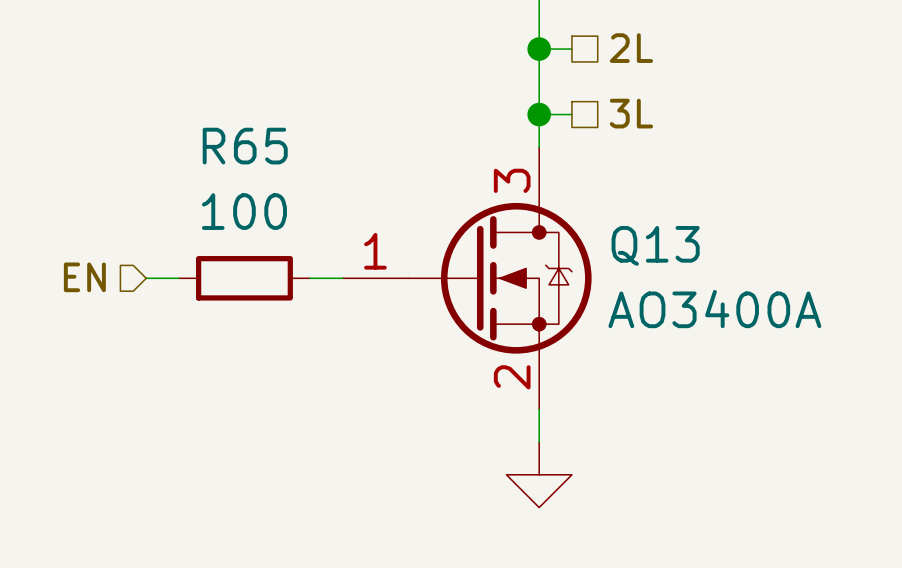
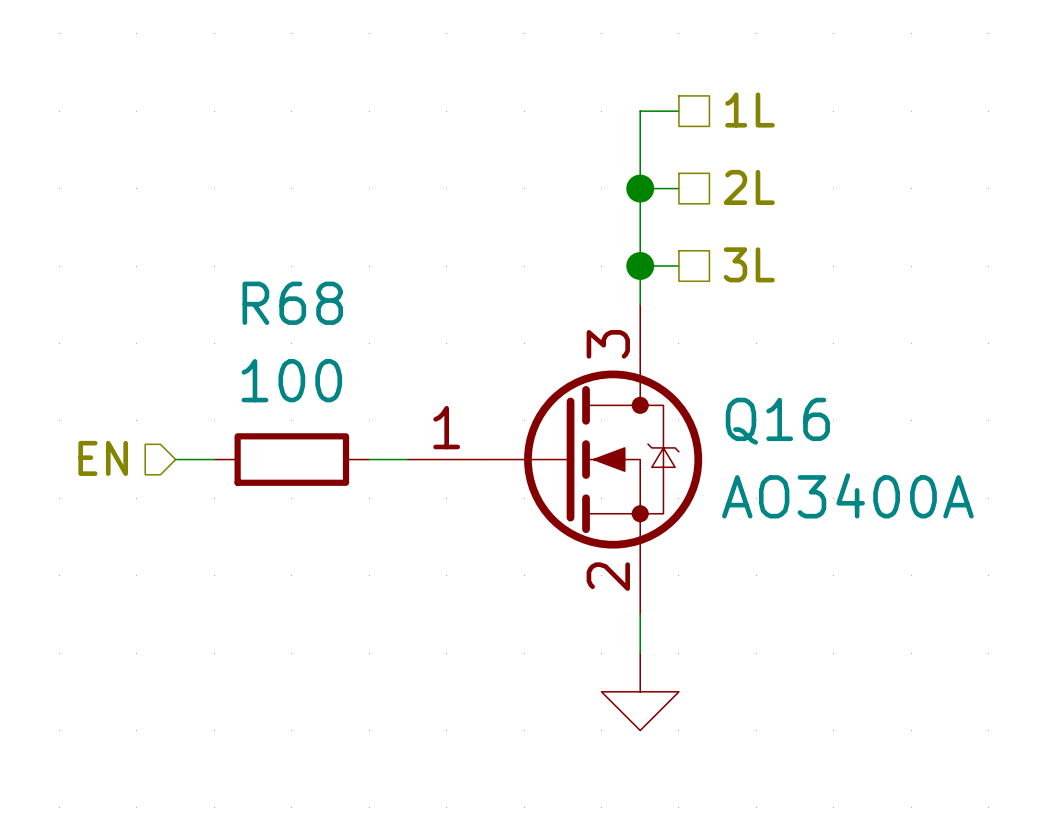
R65 name: R65 (245, 146) -> R68 (292, 303)
Q13 name: Q13 (655, 245) -> Q16 (777, 421)

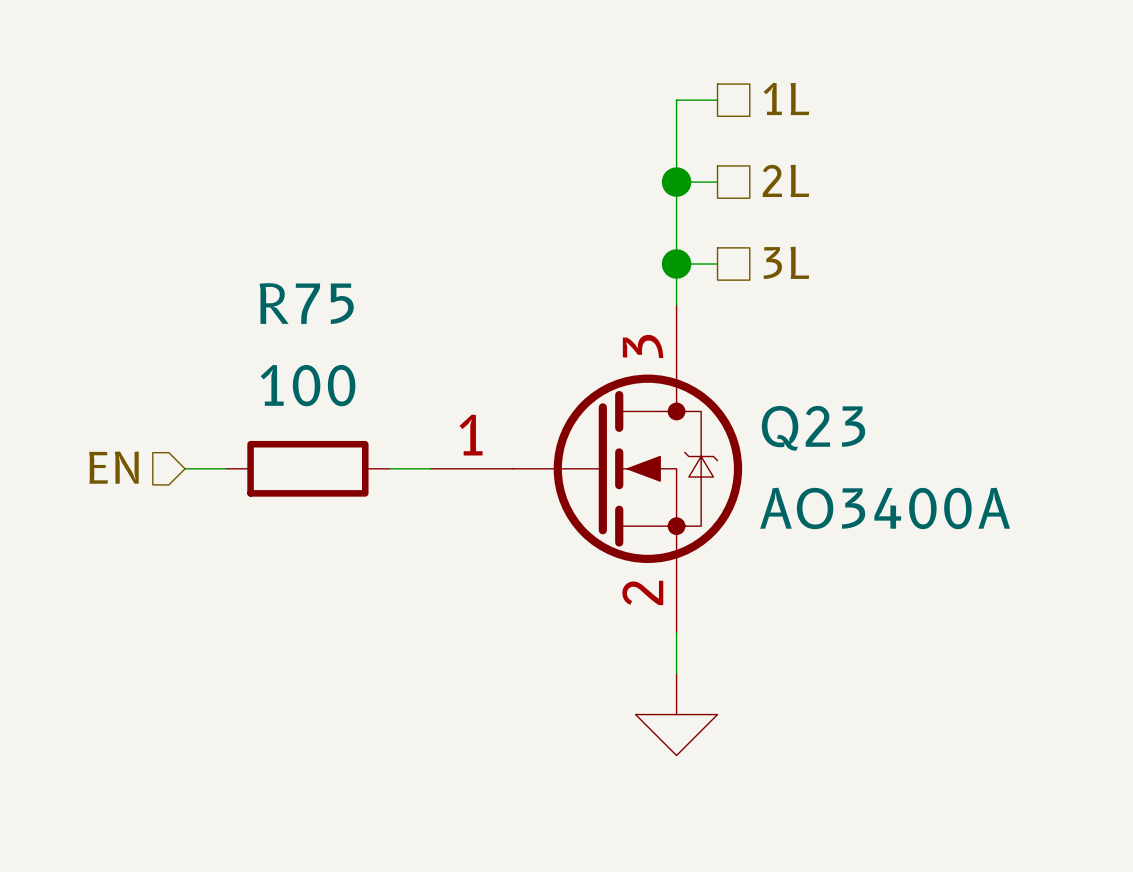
R68 name: R68 (292, 303) -> R75 (306, 303)
Q16 name: Q16 (777, 421) -> Q23 (813, 428)

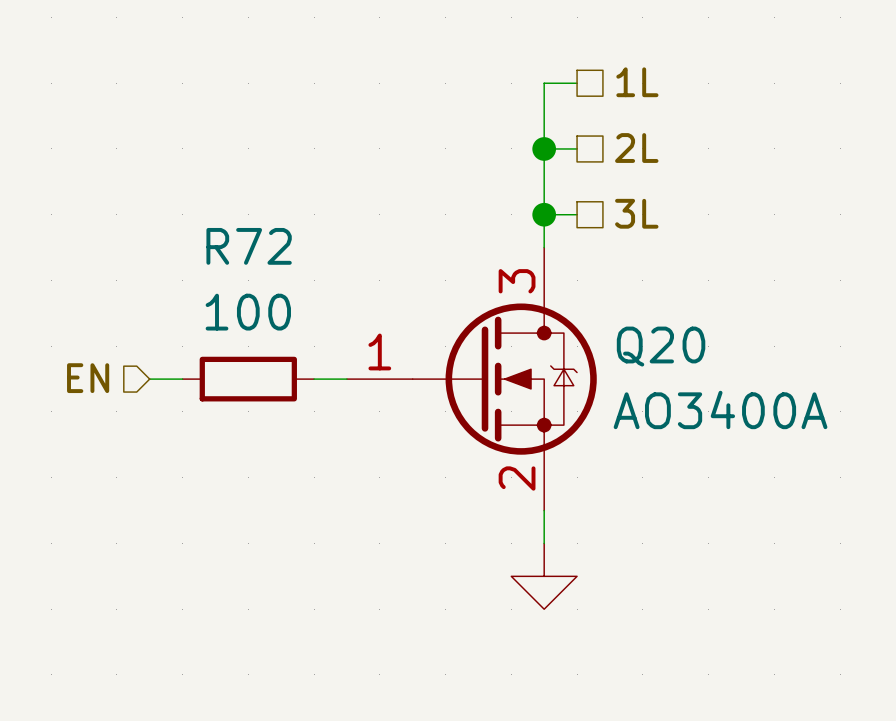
R75 name: R75 (306, 303) -> R72 (249, 246)
Q23 name: Q23 (813, 428) -> Q20 (661, 346)

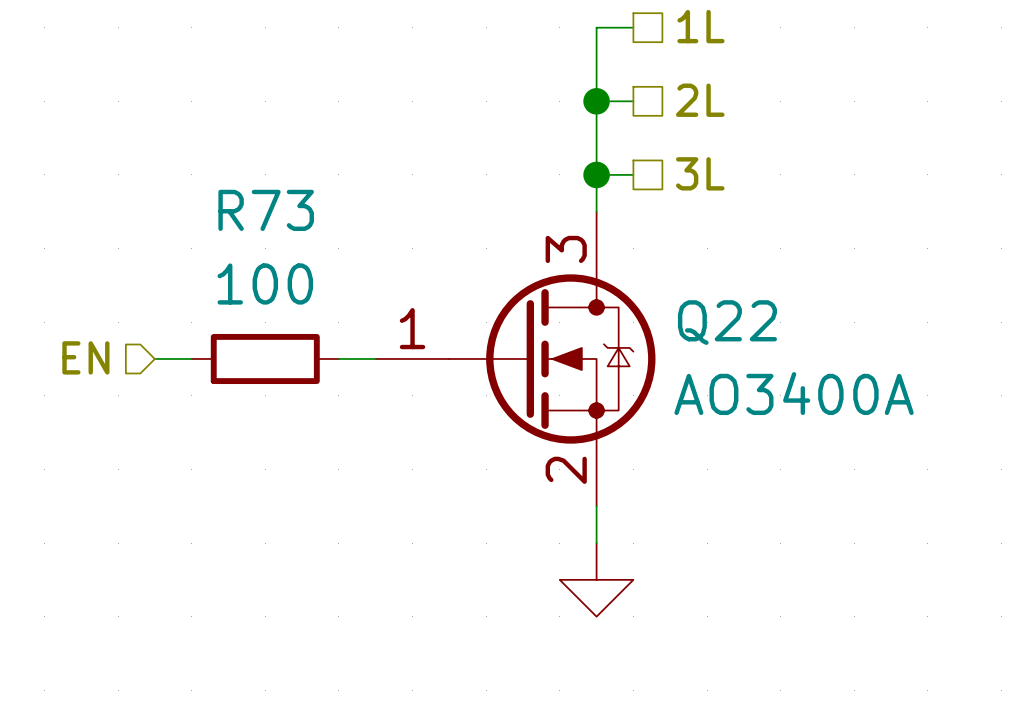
R72 name: R72 (249, 246) -> R73 (266, 210)
Q20 name: Q20 (661, 346) -> Q22 (727, 322)

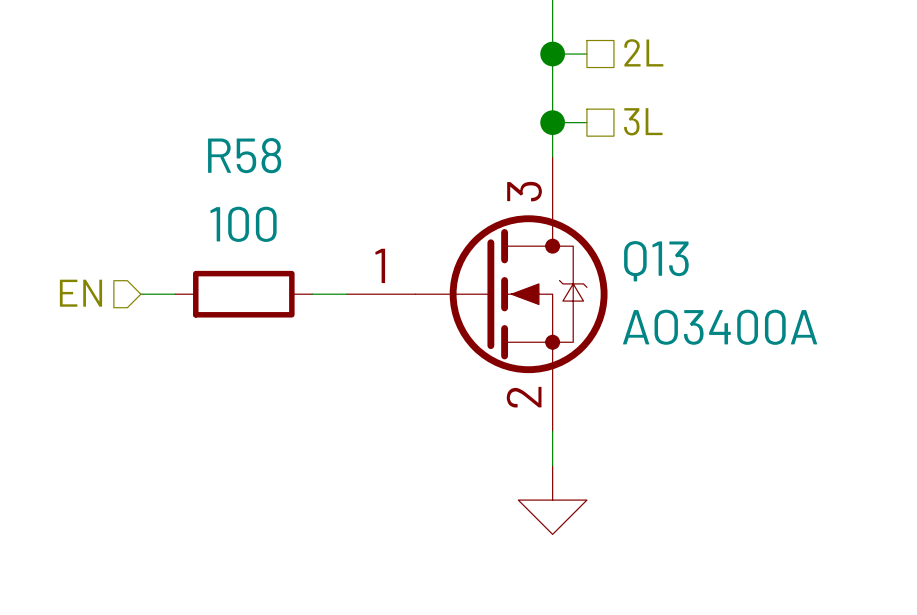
R73 name: R73 (266, 210) -> R58 (244, 155)
Q22 name: Q22 (727, 322) -> Q13 (656, 261)

